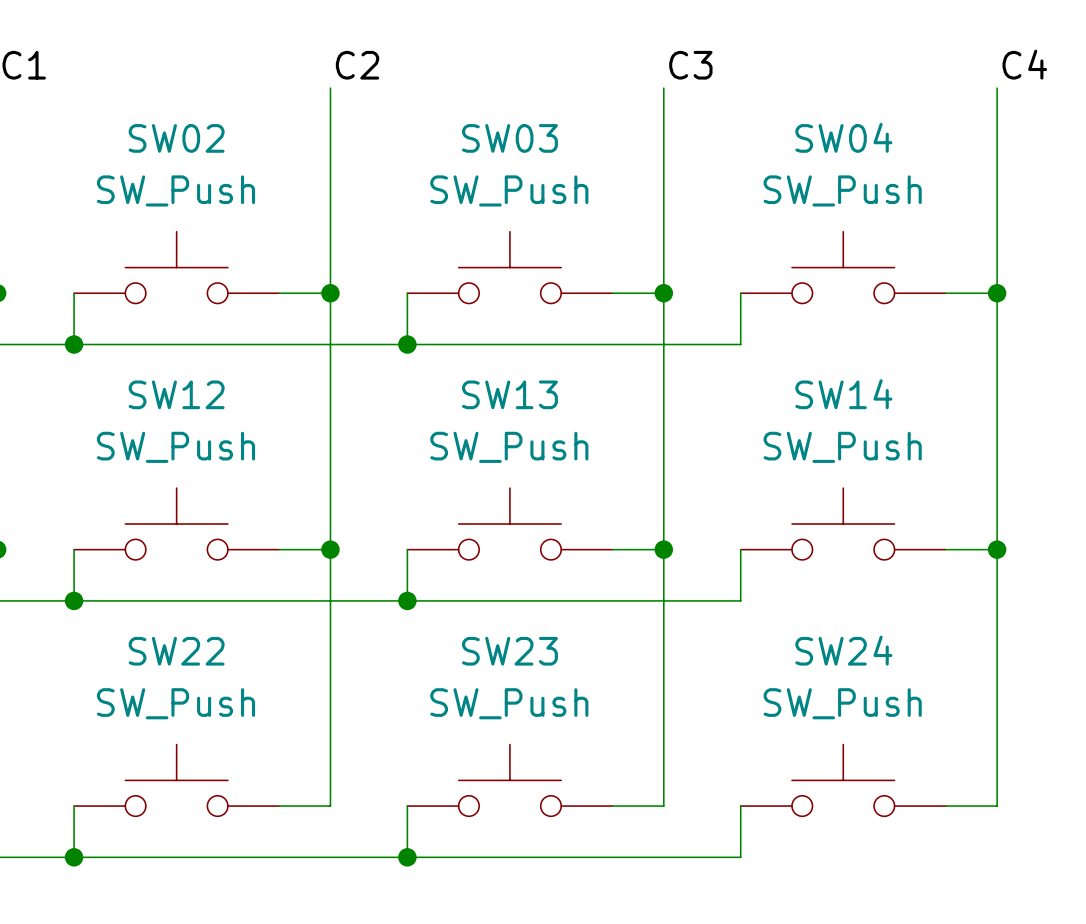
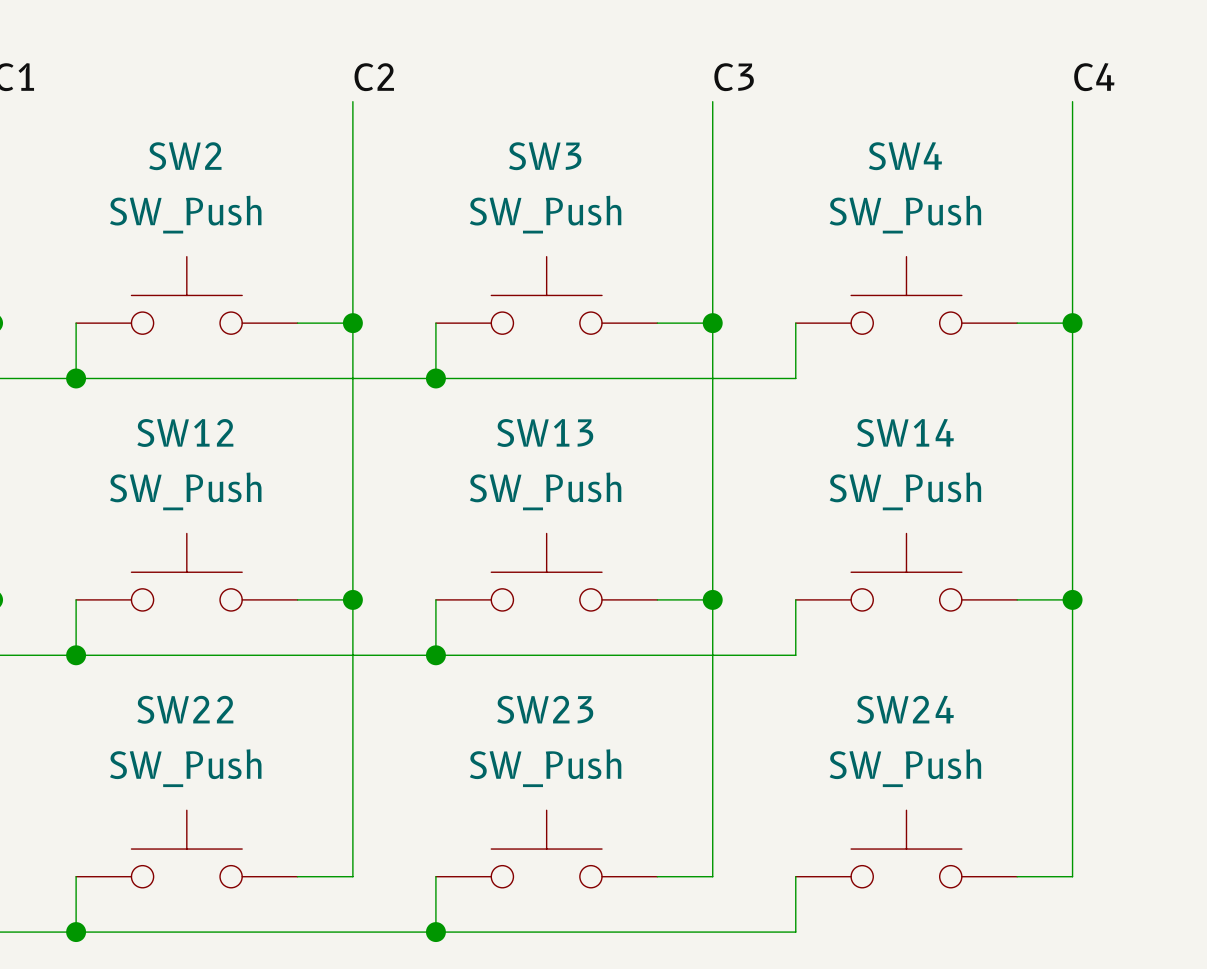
SW04 name: SW04 (843, 137) -> SW4 (905, 156)
SW02 name: SW02 (176, 138) -> SW2 (185, 156)
SW03 name: SW03 (509, 138) -> SW3 (545, 156)

